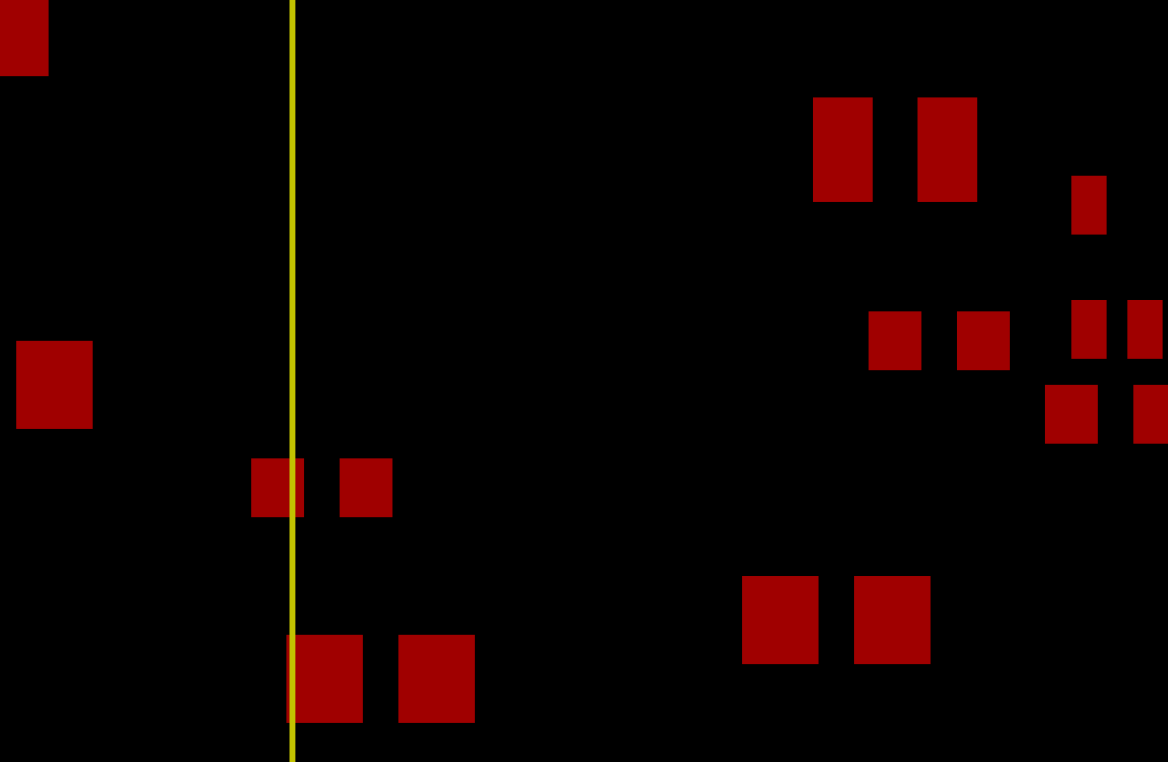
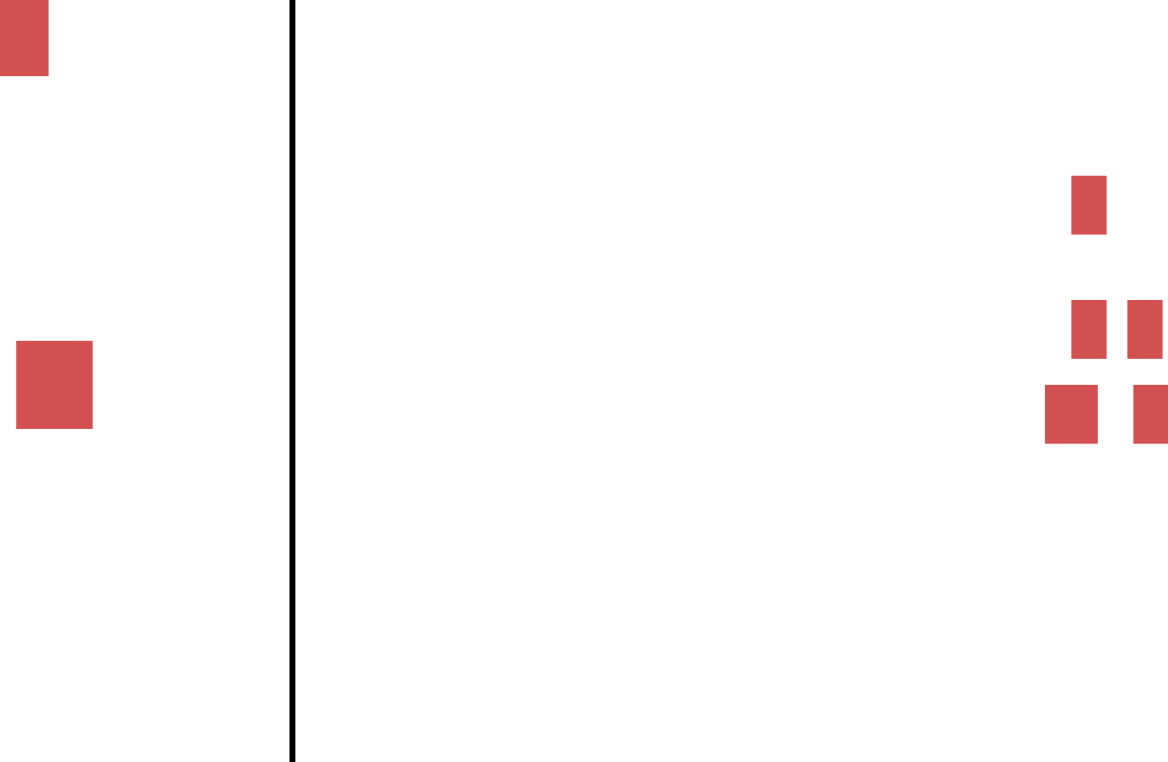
part: (895, 149) -> none
part: (939, 340) -> none
part: (321, 487) -> none
part: (836, 620) -> none
part: (380, 678) -> none

